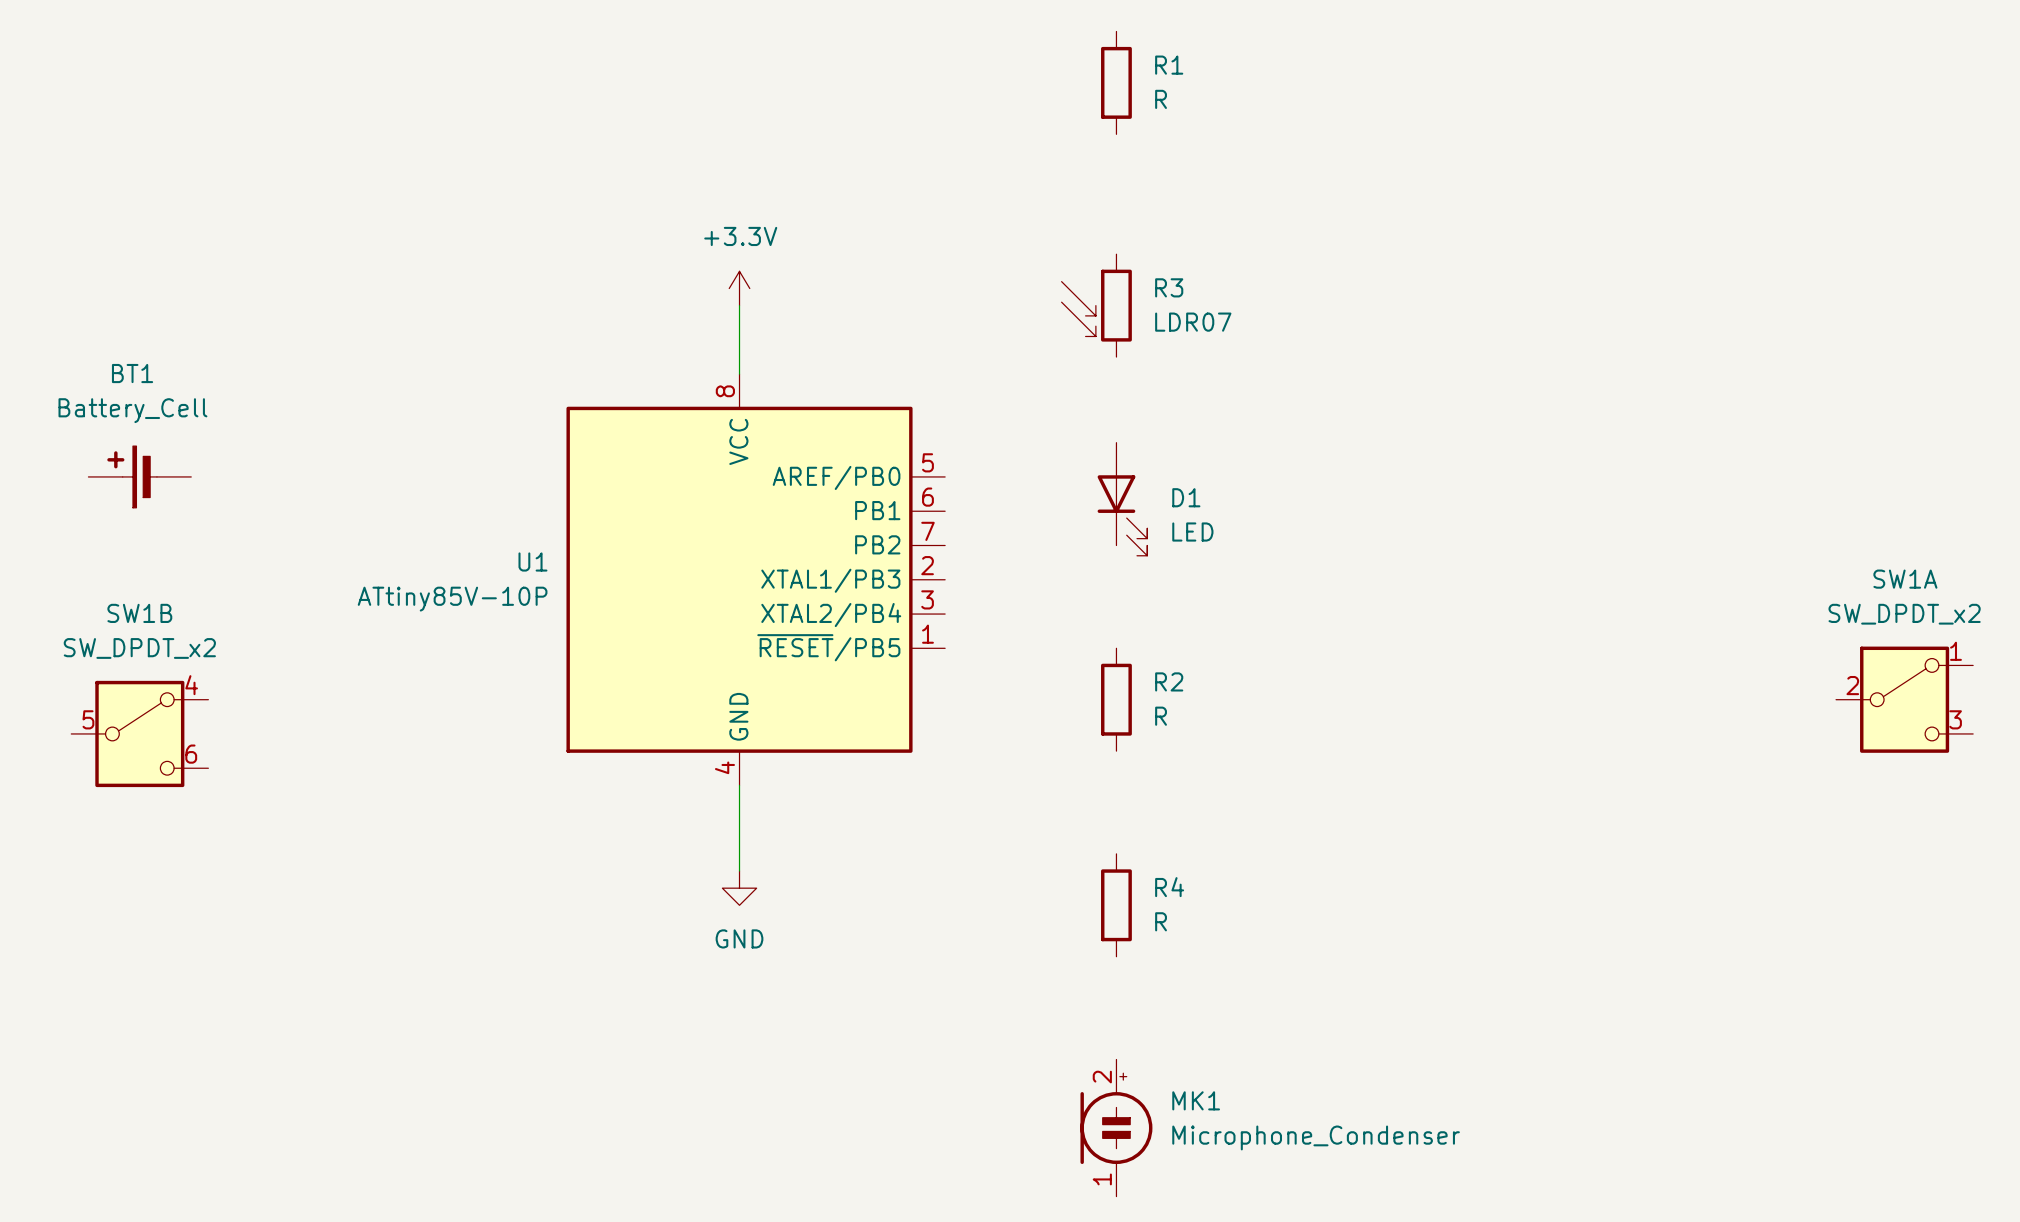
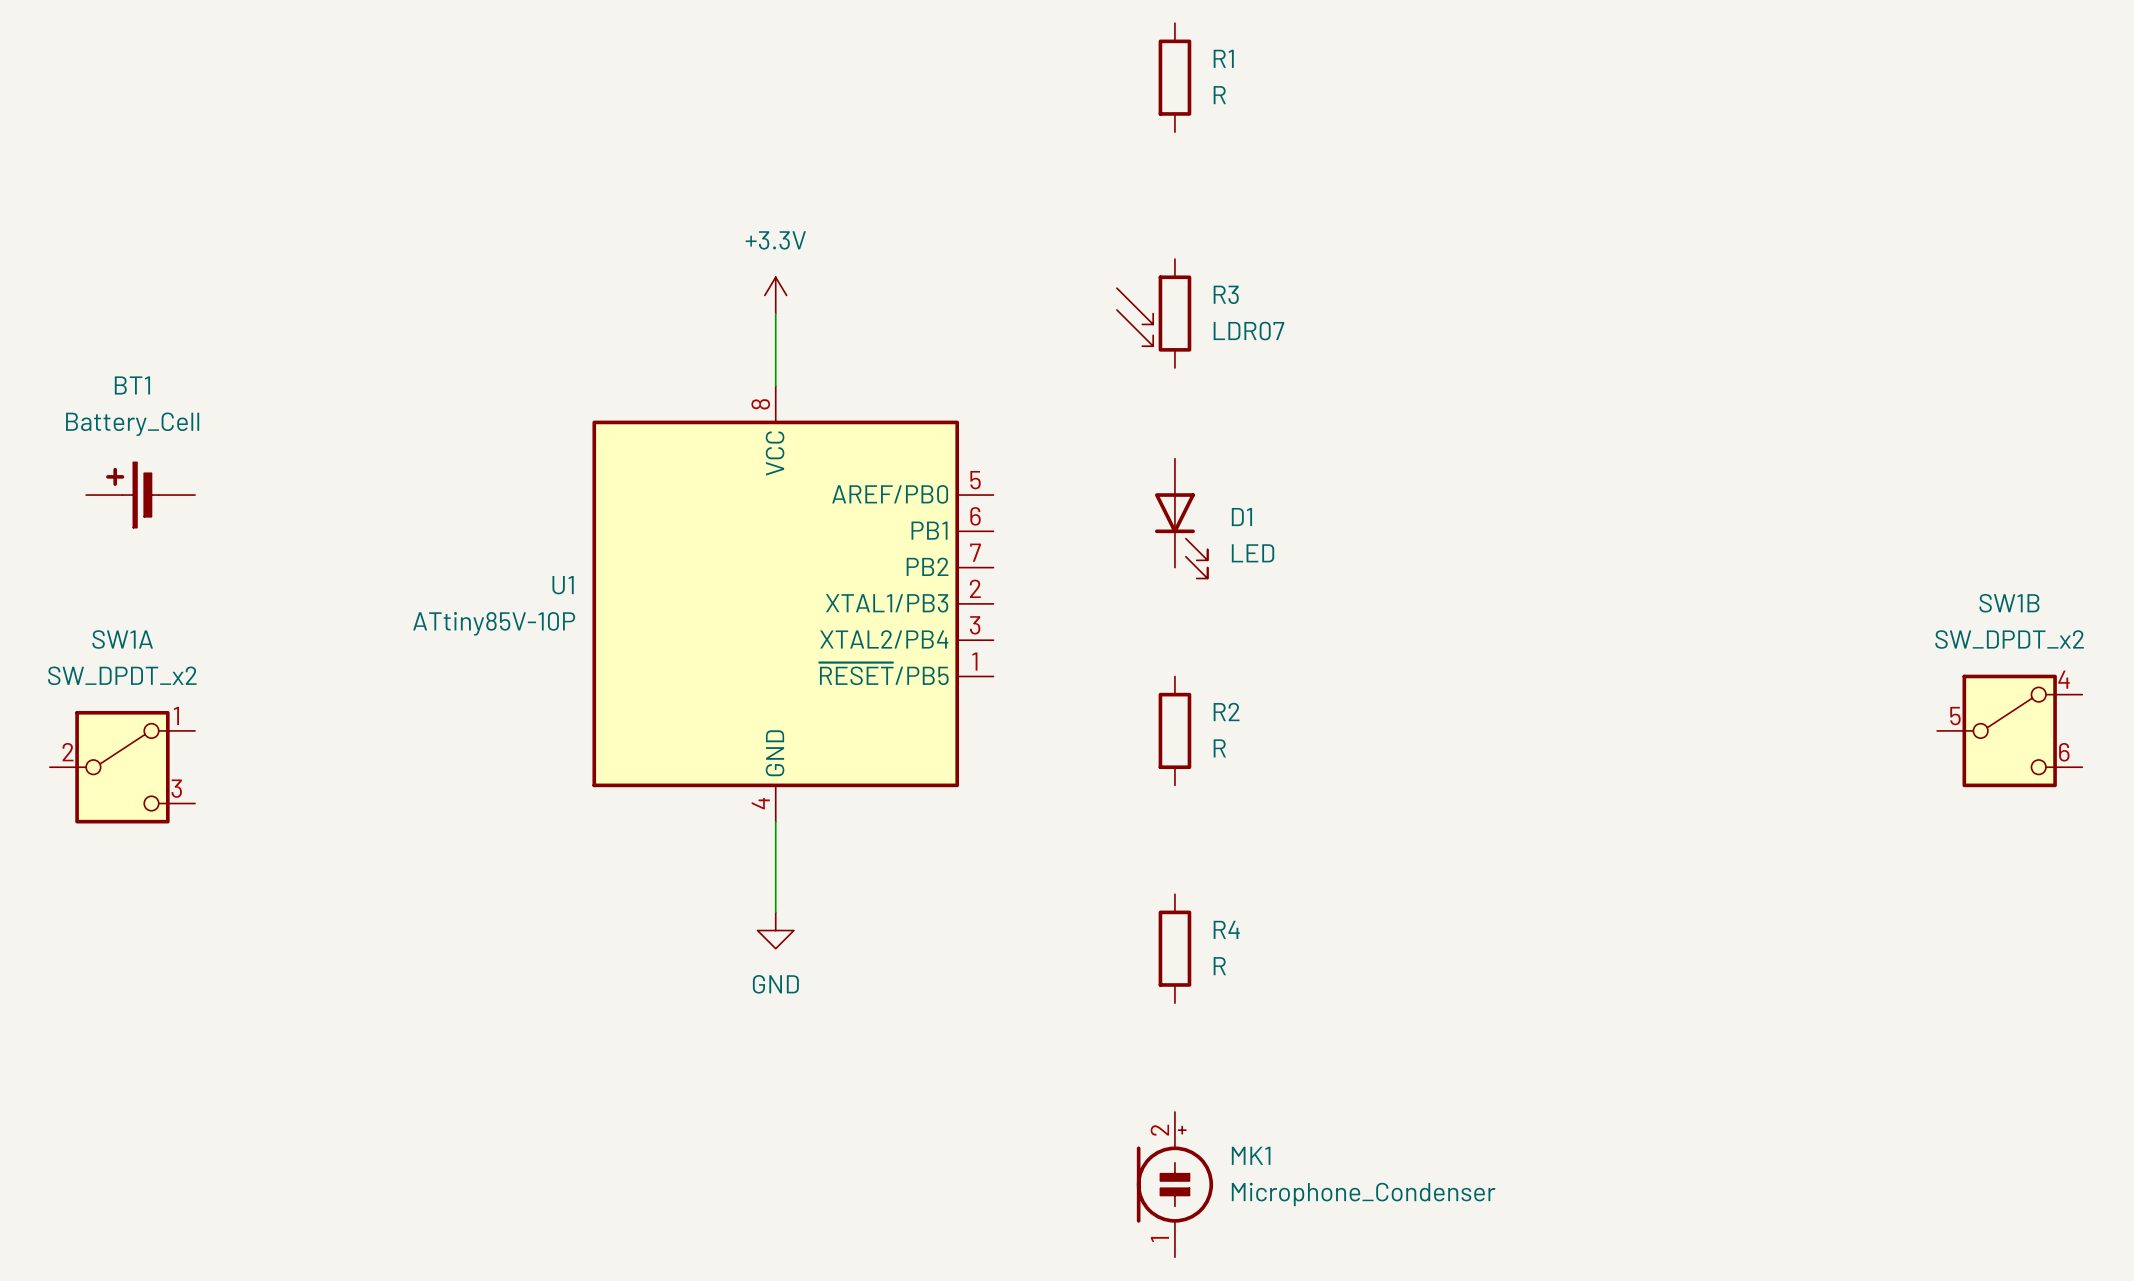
SW1A position: (1904, 699) -> (122, 767)
SW1B position: (139, 733) -> (2009, 730)

